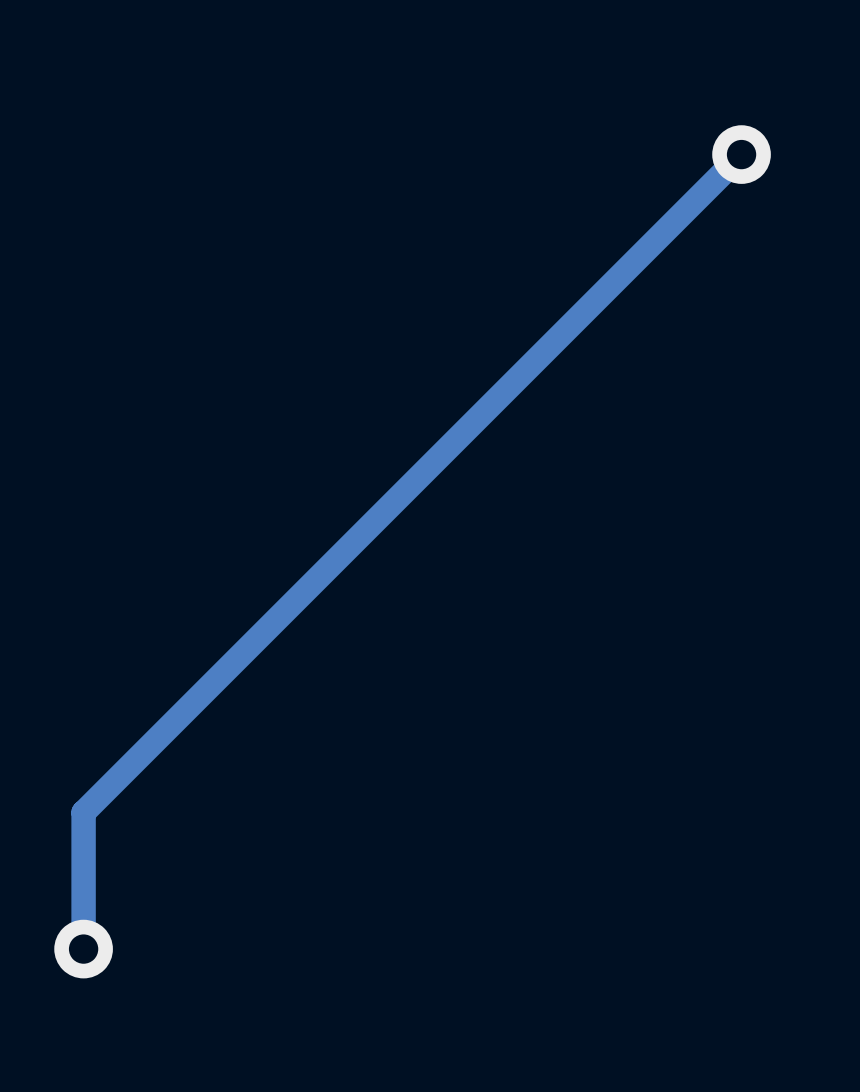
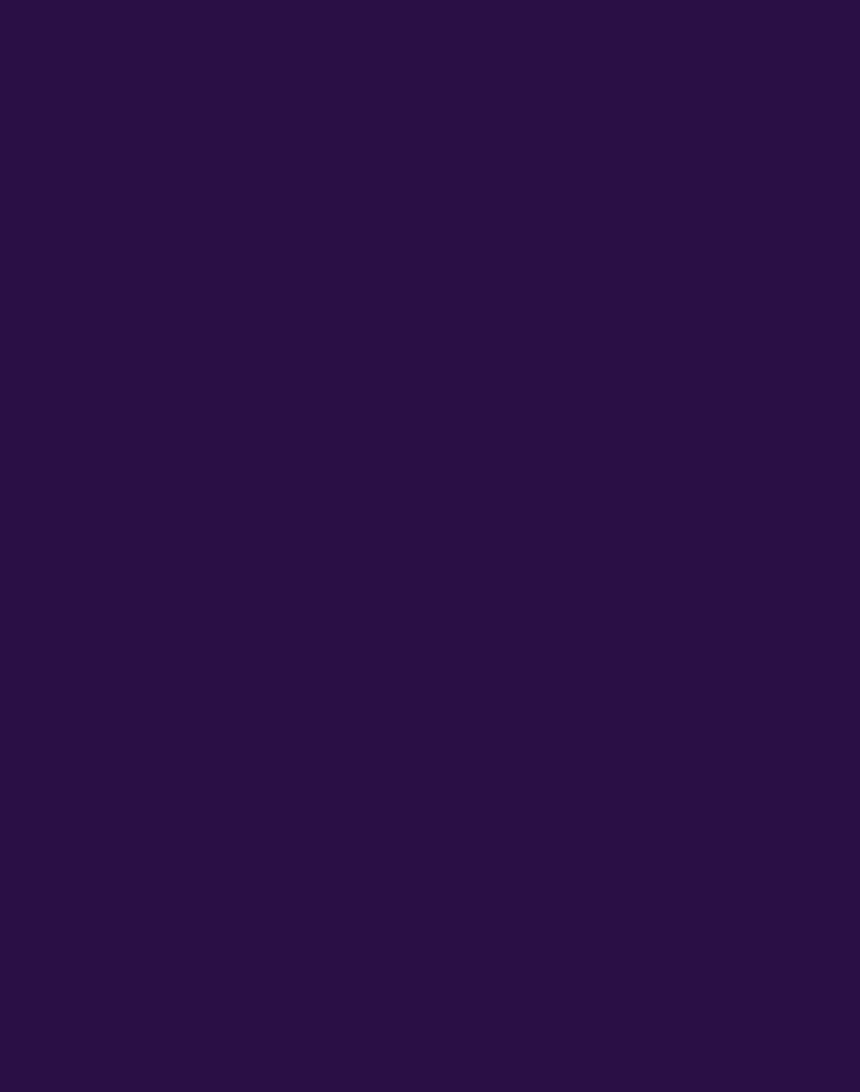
track: (741, 154) (83, 812) (83, 949) -> none
via: (741, 154) -> none
via: (83, 949) -> none

